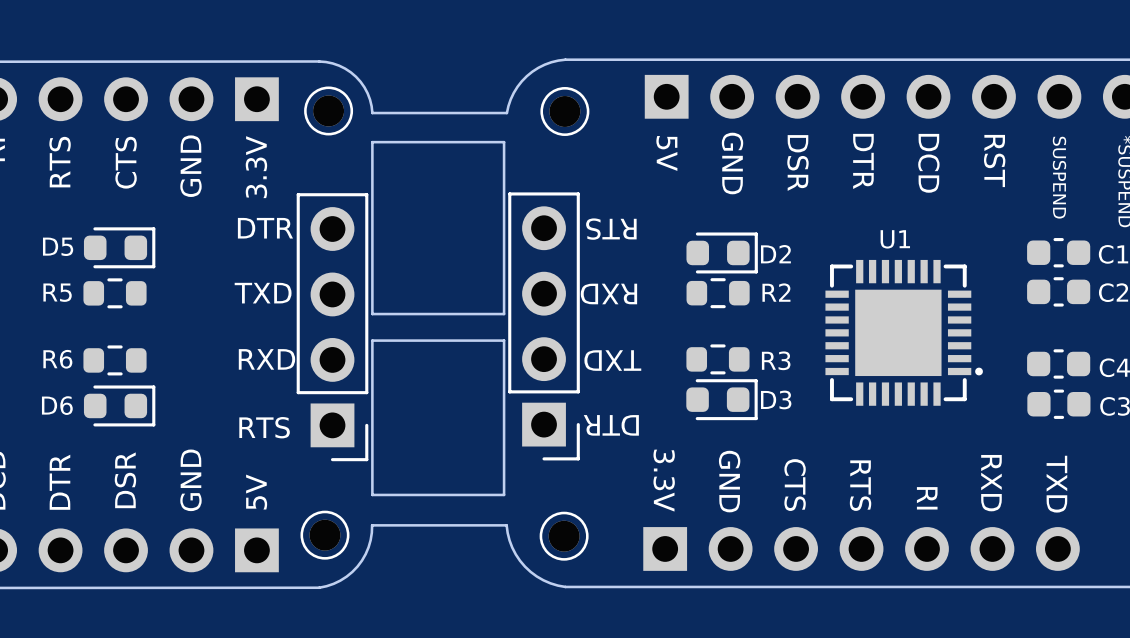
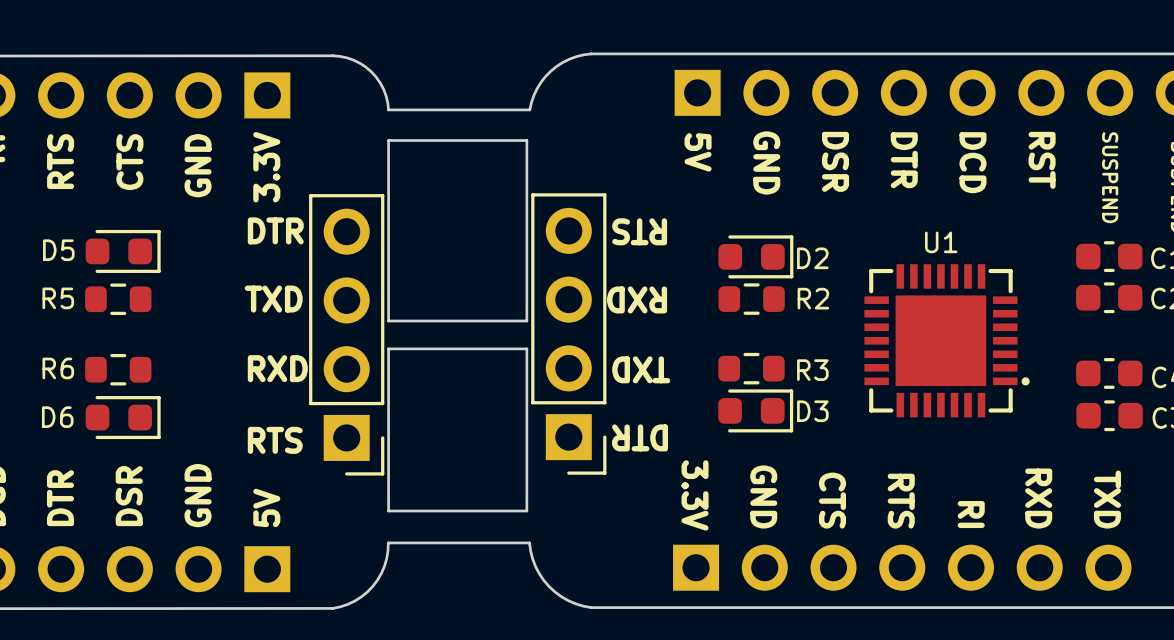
part: (328, 110) -> none
part: (564, 111) -> none
part: (324, 535) -> none
part: (564, 536) -> none

